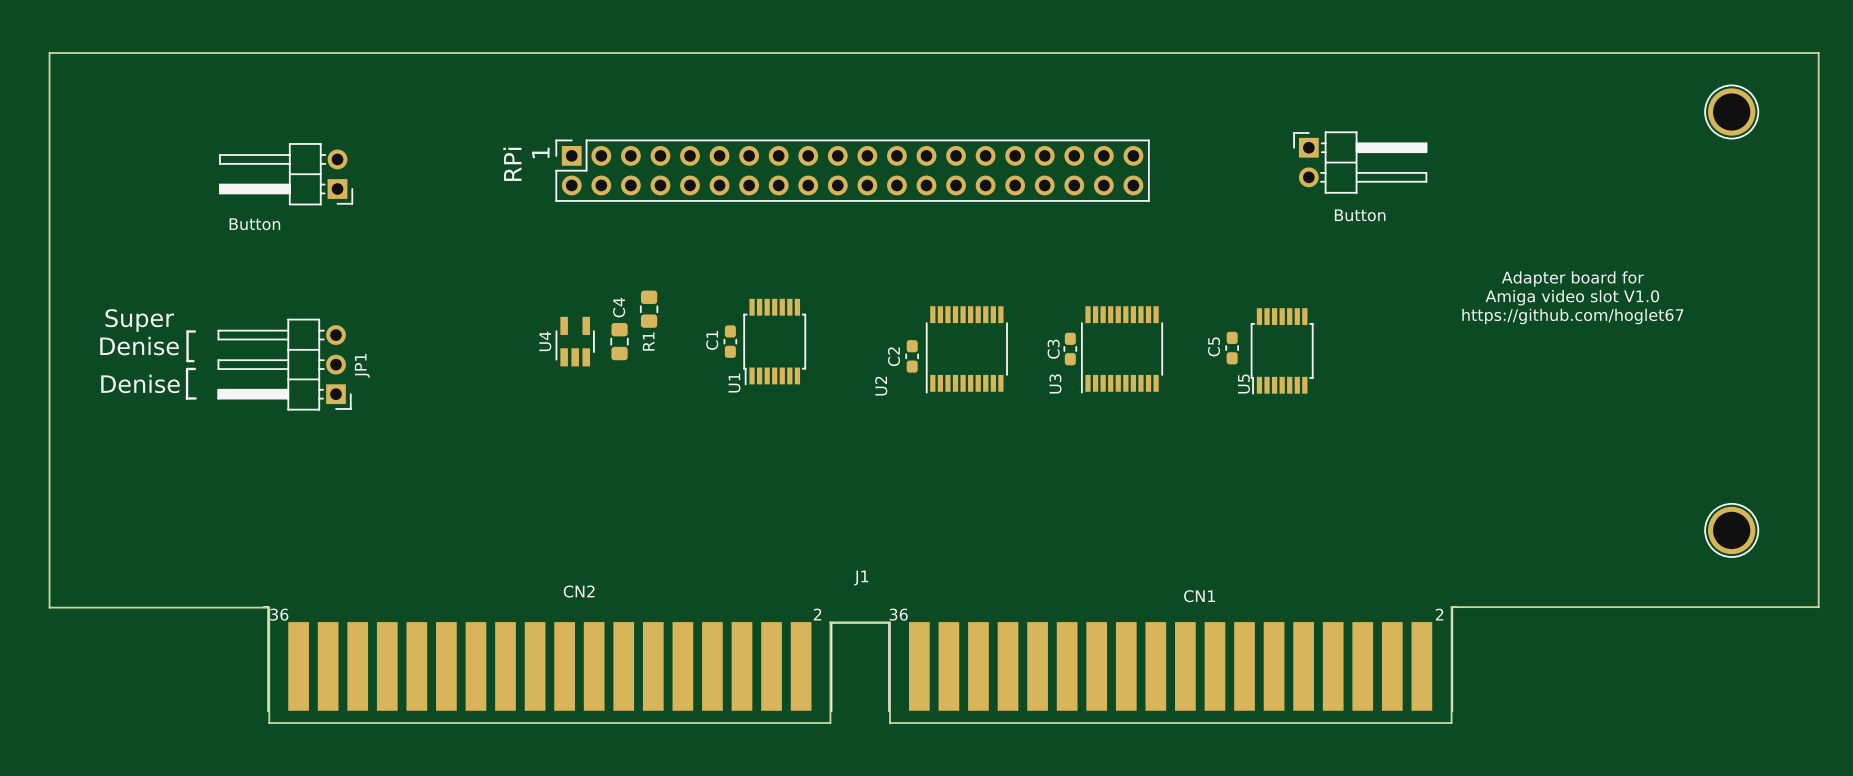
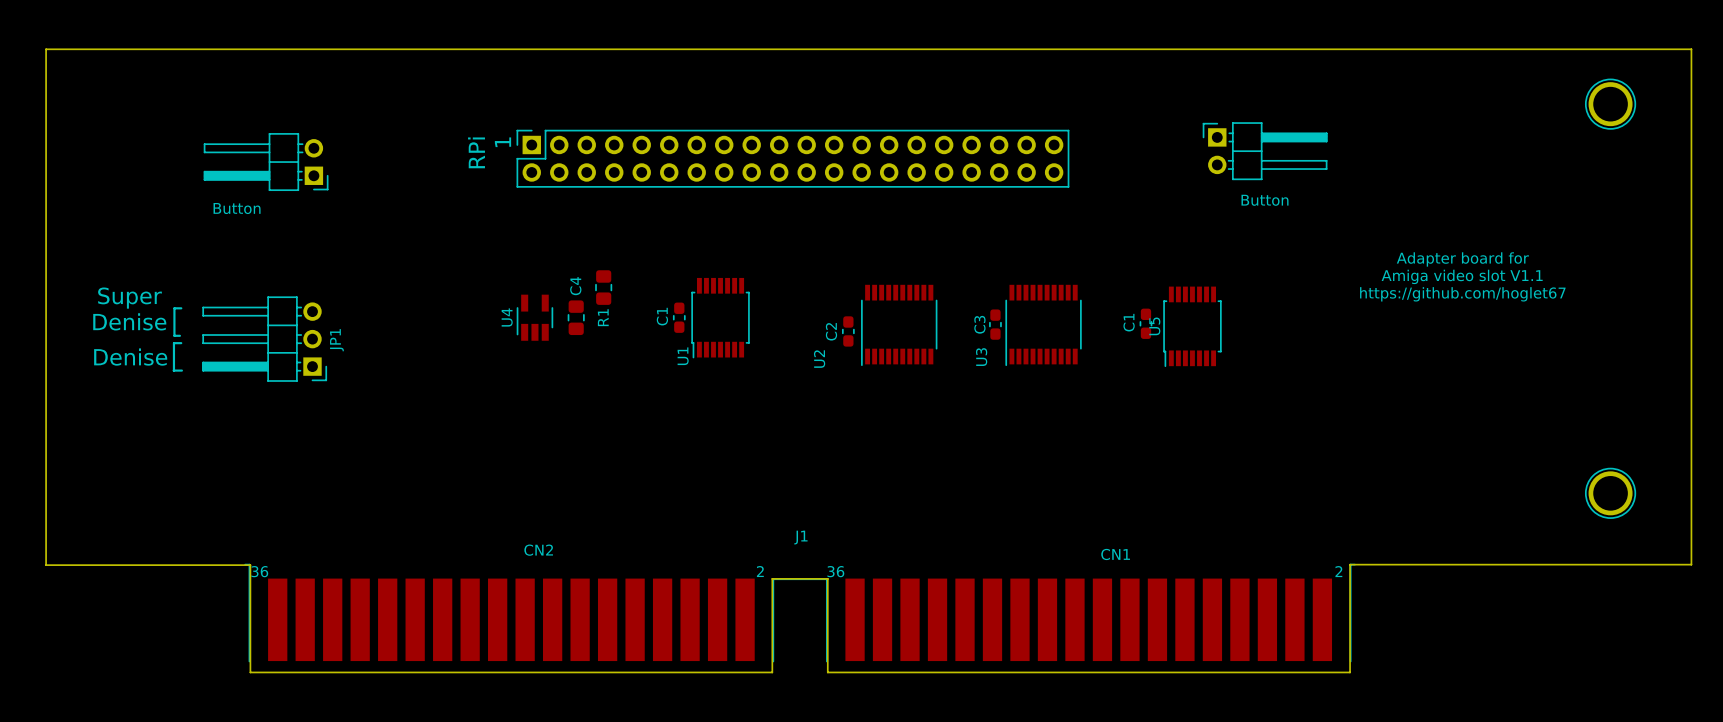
text: Amiga video slot V1.0 (1572, 297) -> Amiga video slot V1.1 (1462, 276)
C5 name: C5 (1214, 346) -> C1 (1129, 322)
U5 name position: U5 (1243, 383) -> U5 (1154, 326)

